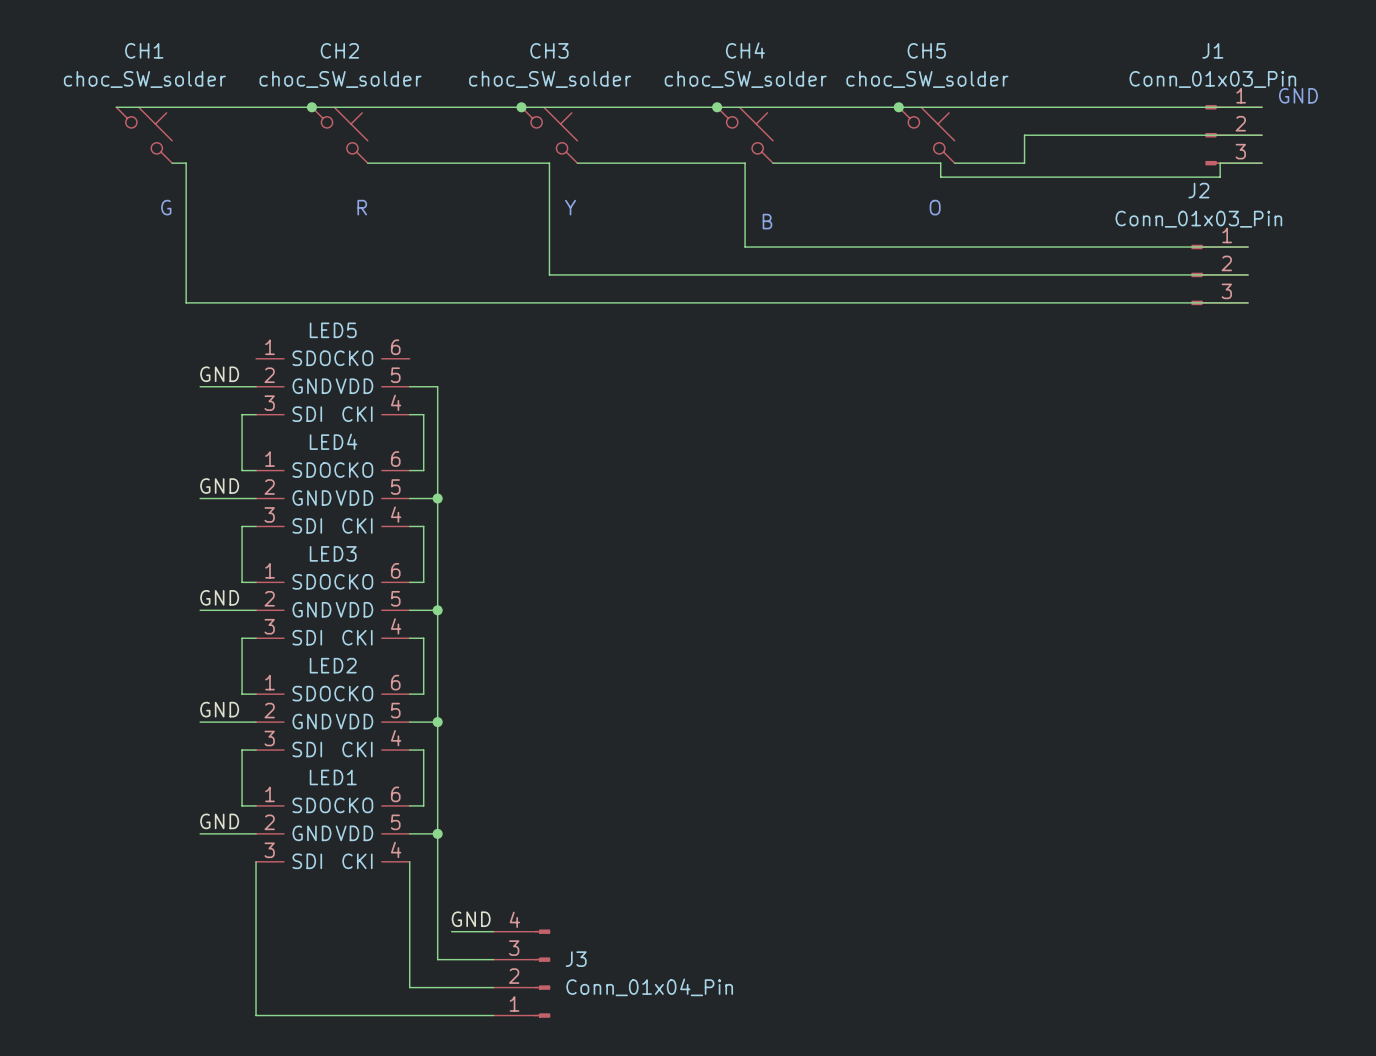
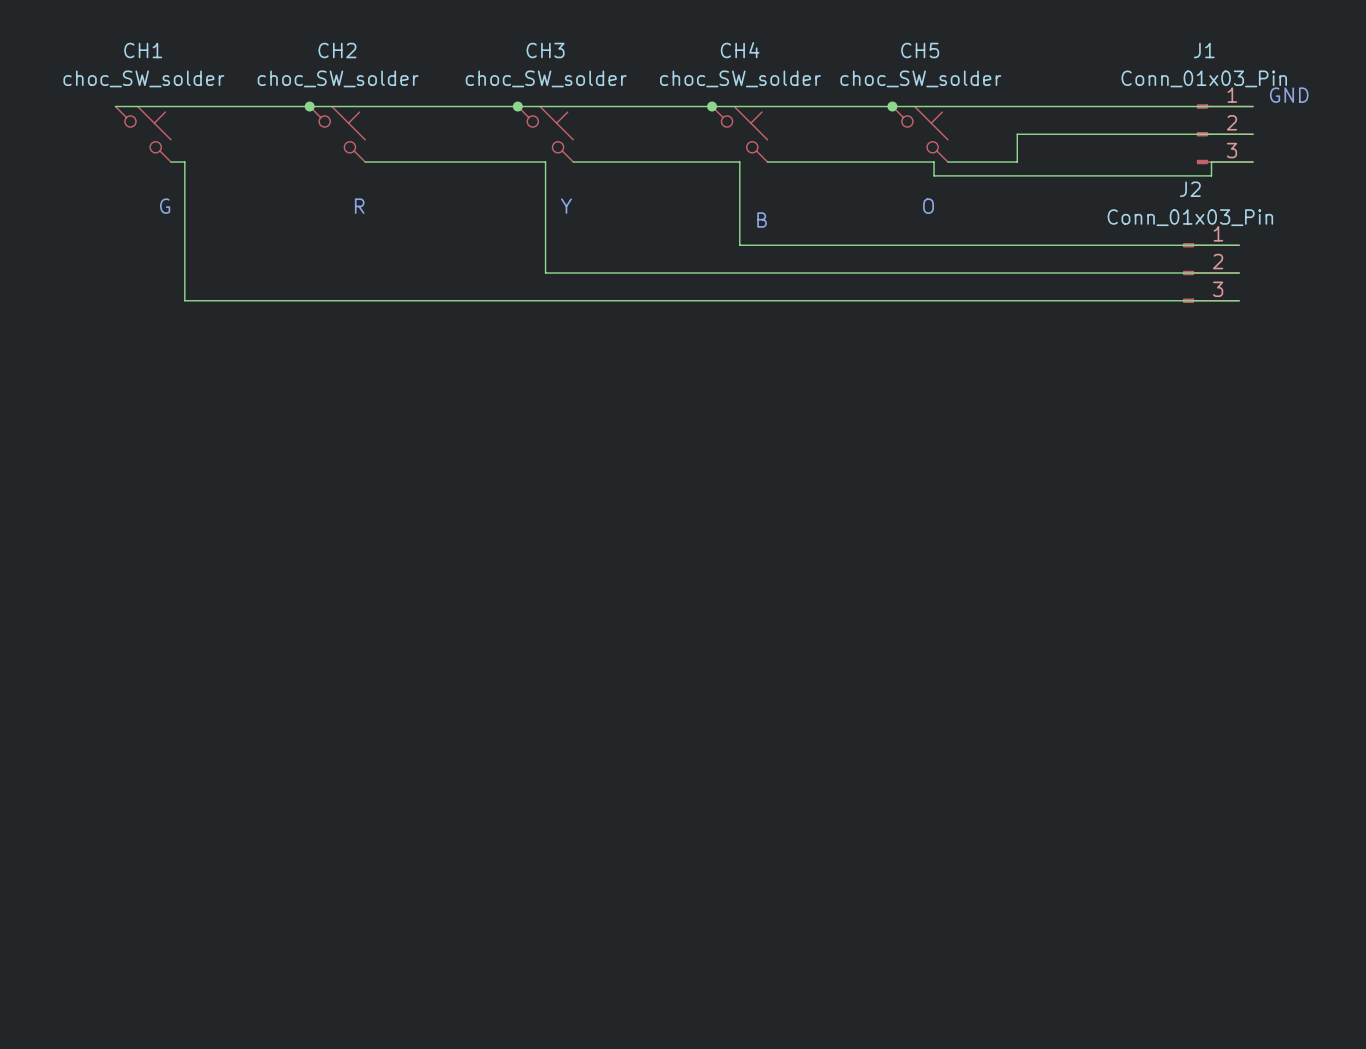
label: GND (219, 374) -> none
wire: (200, 386) (256, 386) -> none
LED5: (332, 386) -> none
wire: (409, 386) (437, 386) (437, 959) (493, 959) -> none
wire: (256, 414) (242, 414) (242, 470) (256, 470) -> none
wire: (409, 414) (423, 414) (423, 470) (409, 470) -> none
label: GND (219, 486) -> none
wire: (200, 498) (256, 498) -> none
LED4: (332, 498) -> none
wire: (409, 498) (437, 498) -> none
junction: (437, 498) -> none
wire: (256, 526) (242, 526) (242, 582) (256, 582) -> none
wire: (409, 526) (423, 526) (423, 582) (409, 582) -> none
label: GND (219, 597) -> none
wire: (200, 610) (256, 610) -> none
LED3: (332, 610) -> none
wire: (409, 610) (437, 610) -> none
junction: (437, 610) -> none
wire: (256, 638) (242, 638) (242, 694) (256, 694) -> none
wire: (409, 638) (423, 638) (423, 694) (409, 694) -> none
label: GND (219, 709) -> none
wire: (200, 722) (256, 722) -> none
LED2: (332, 722) -> none
wire: (409, 722) (437, 722) -> none
junction: (437, 722) -> none
wire: (256, 750) (242, 750) (242, 805) (256, 805) -> none
wire: (409, 750) (423, 750) (423, 805) (409, 805) -> none
label: GND (219, 821) -> none
wire: (200, 833) (256, 833) -> none
LED1: (332, 833) -> none
wire: (409, 833) (437, 833) -> none
junction: (437, 833) -> none
wire: (256, 861) (256, 1015) (493, 1015) -> none
wire: (409, 861) (409, 987) (493, 987) -> none
label: GND (471, 919) -> none
wire: (451, 931) (493, 931) -> none
J3: Conn_01x04_Pin (521, 973) -> none

